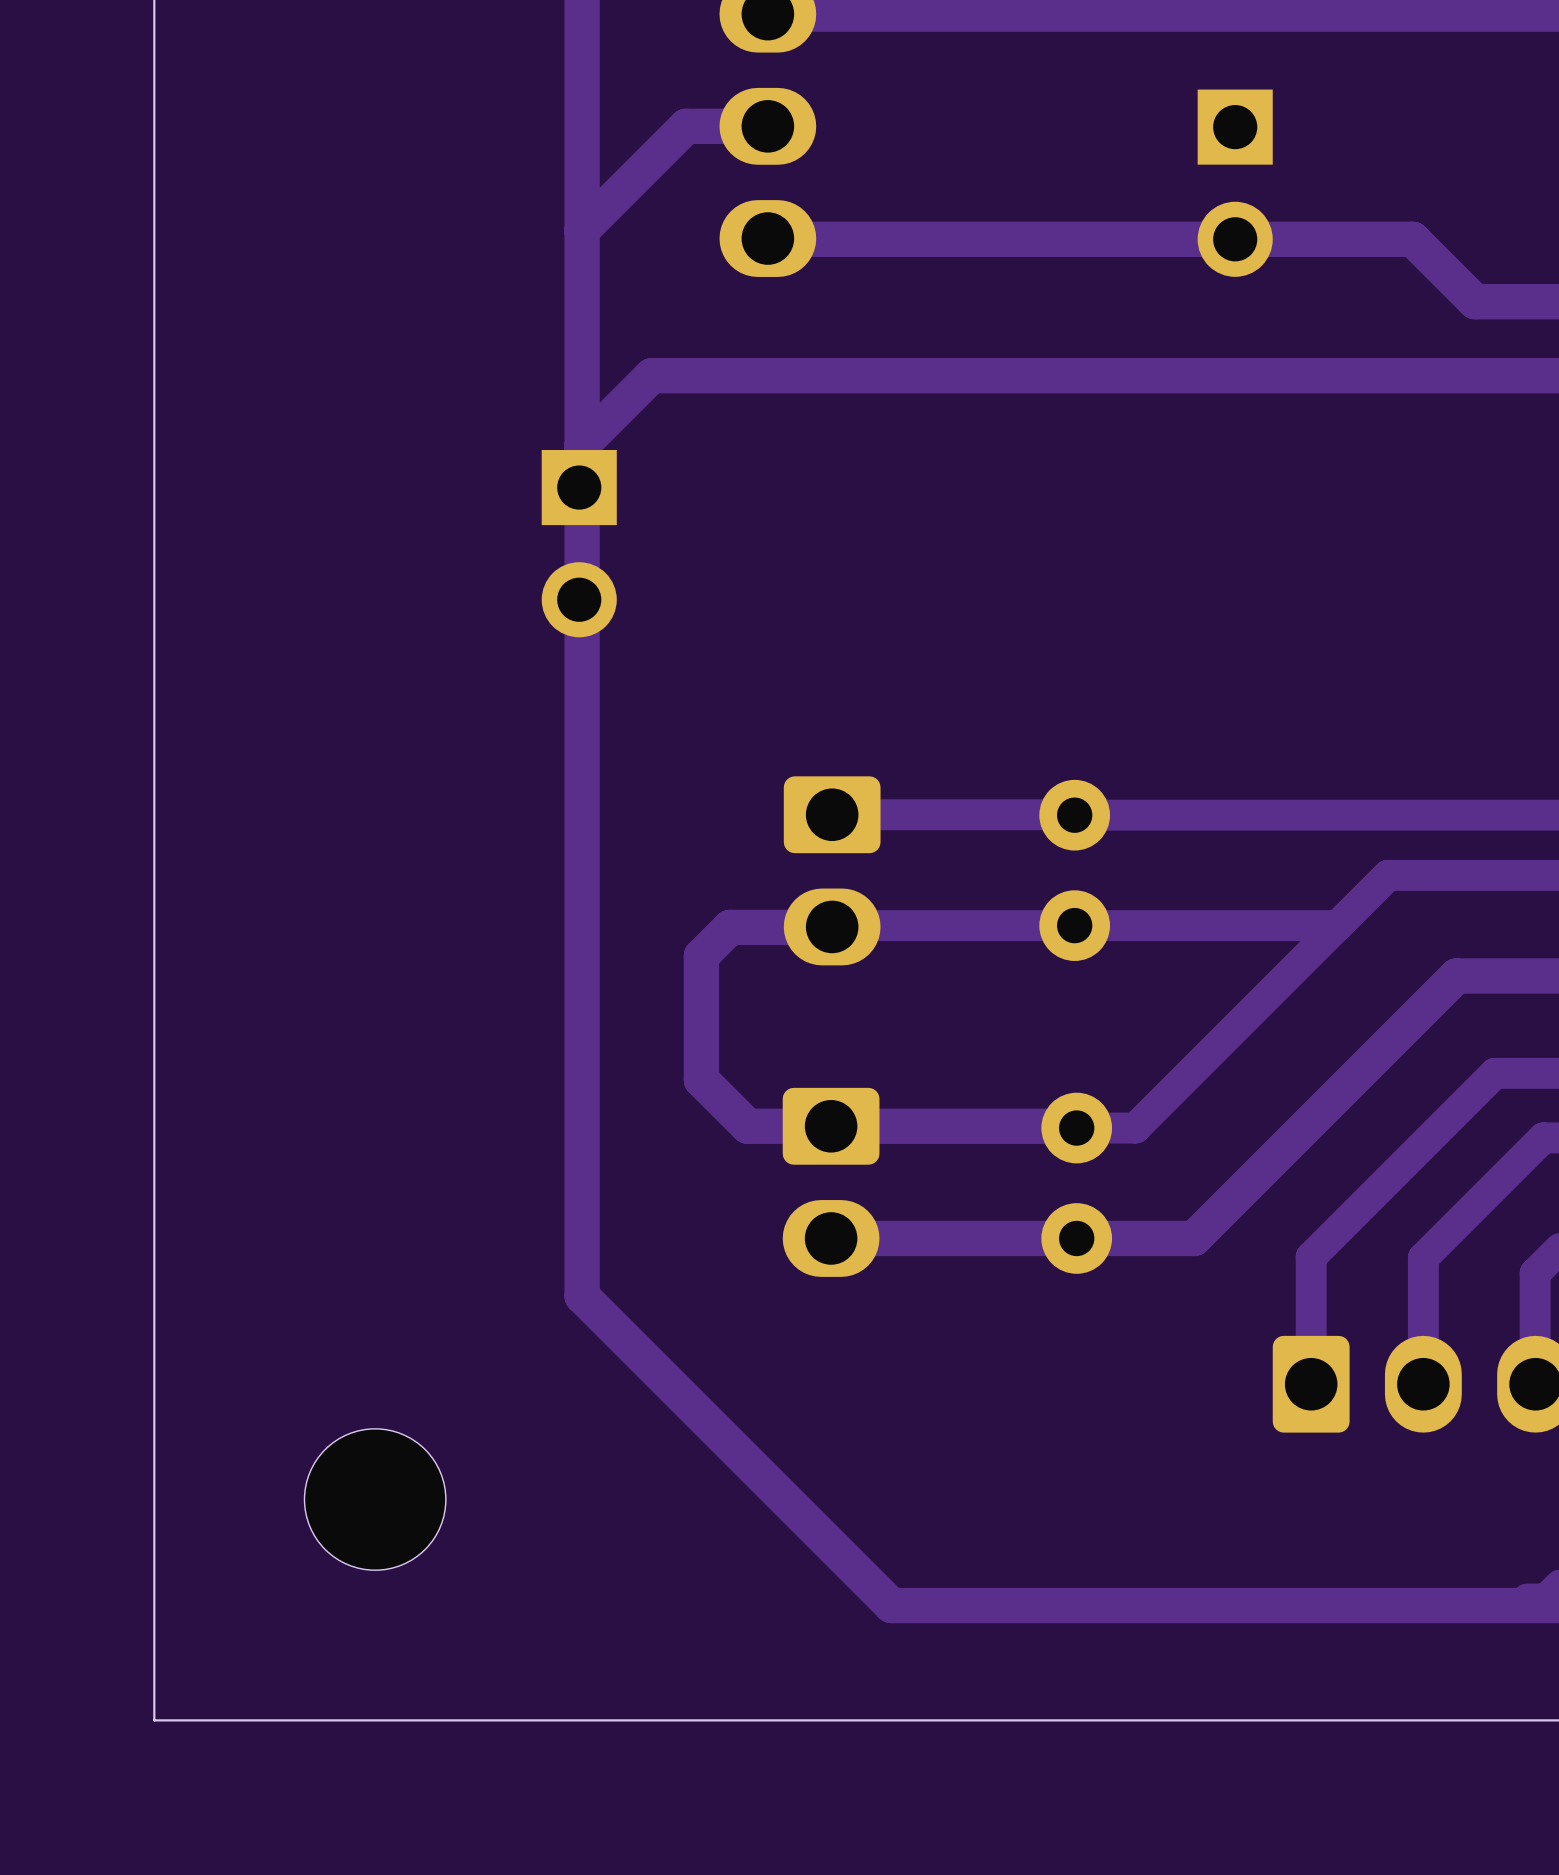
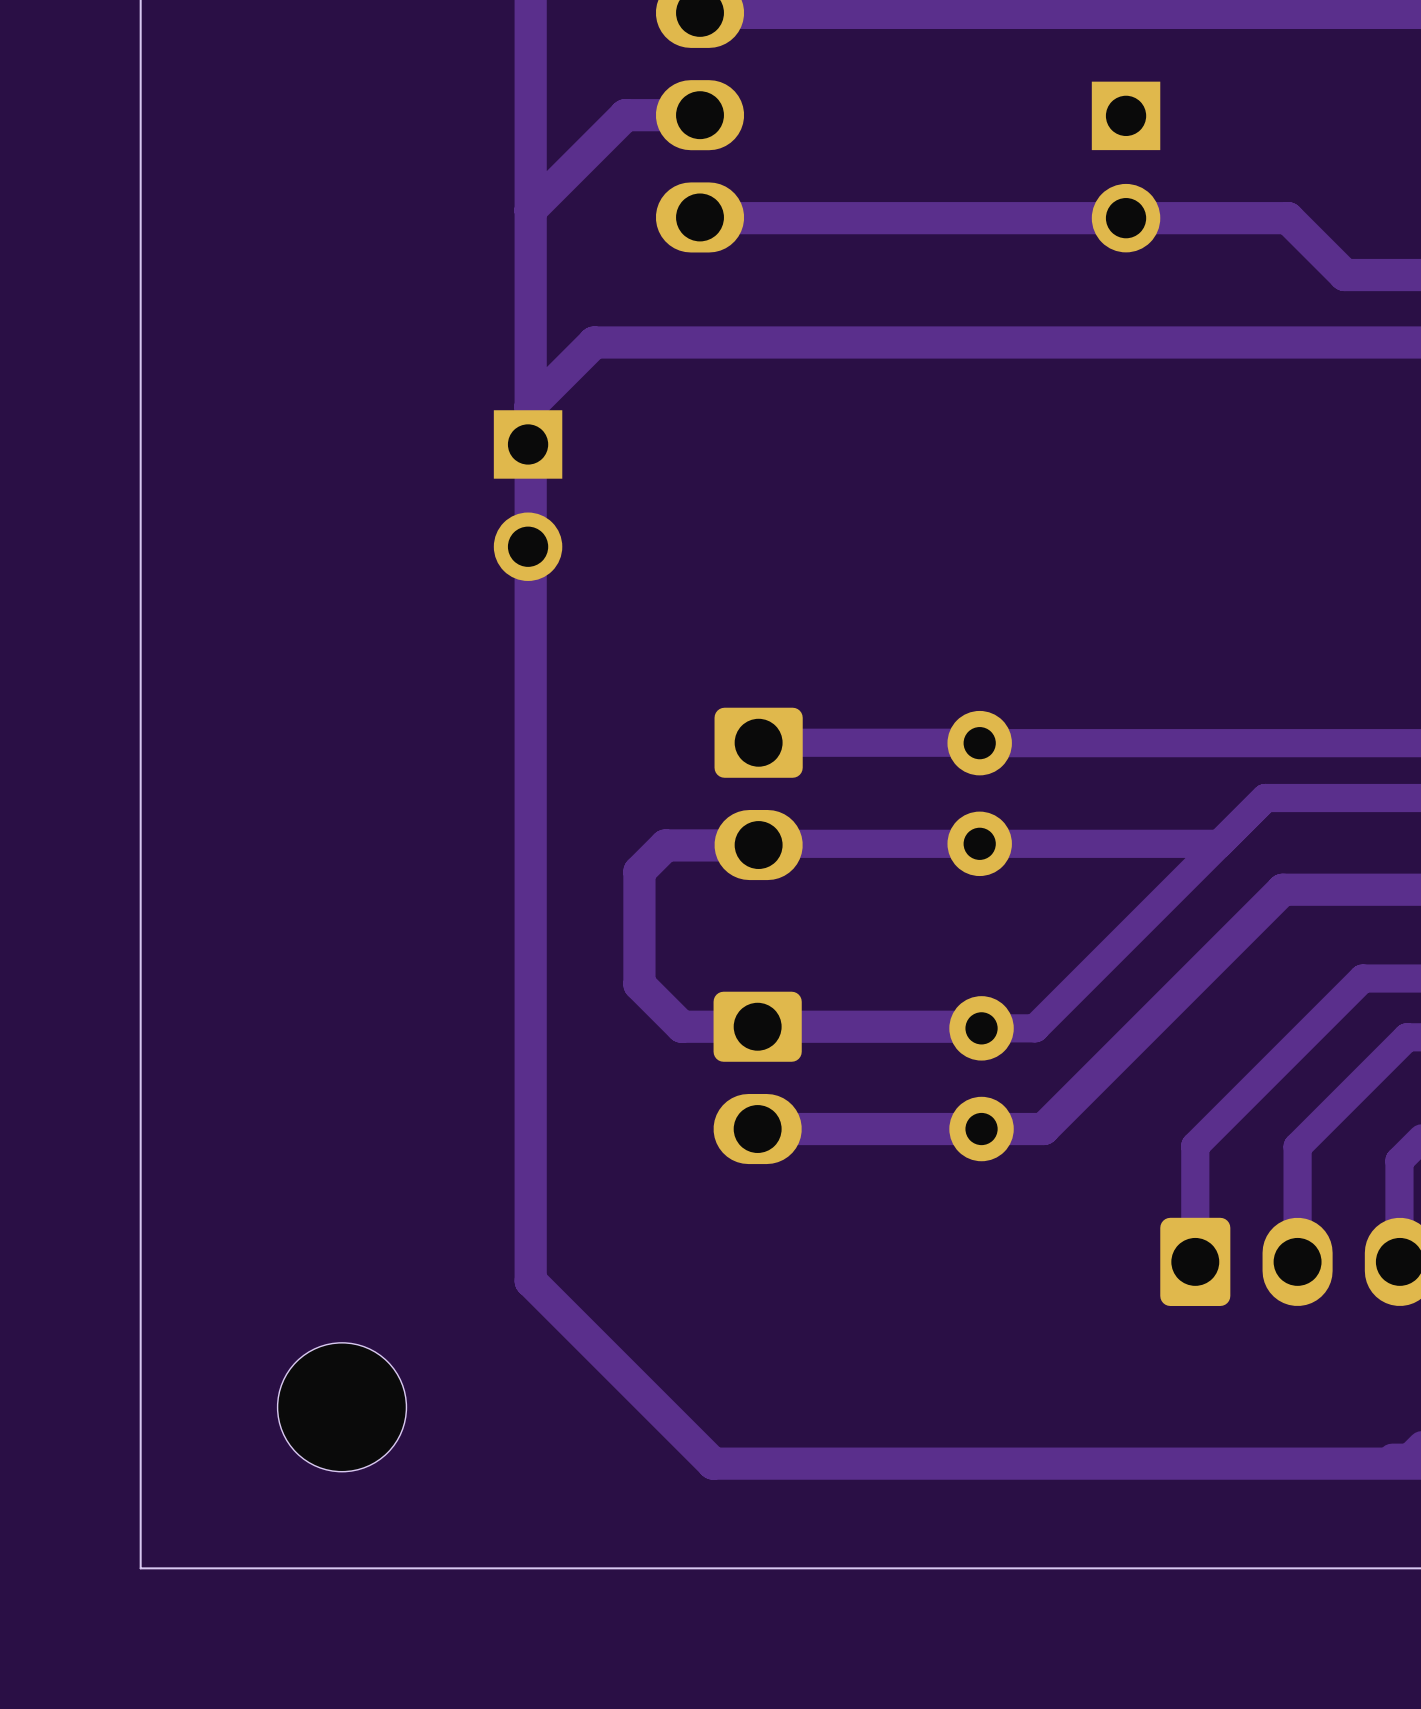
track: (1456, 975) (1194, 1238) (1144, 1238) -> (1327, 889) (1282, 889) (1043, 1129)
track: (582, 1296) (891, 1605) -> (530, 1181) (530, 1281) (713, 1463) (812, 1463)
part position: (375, 1499) -> (342, 1407)

